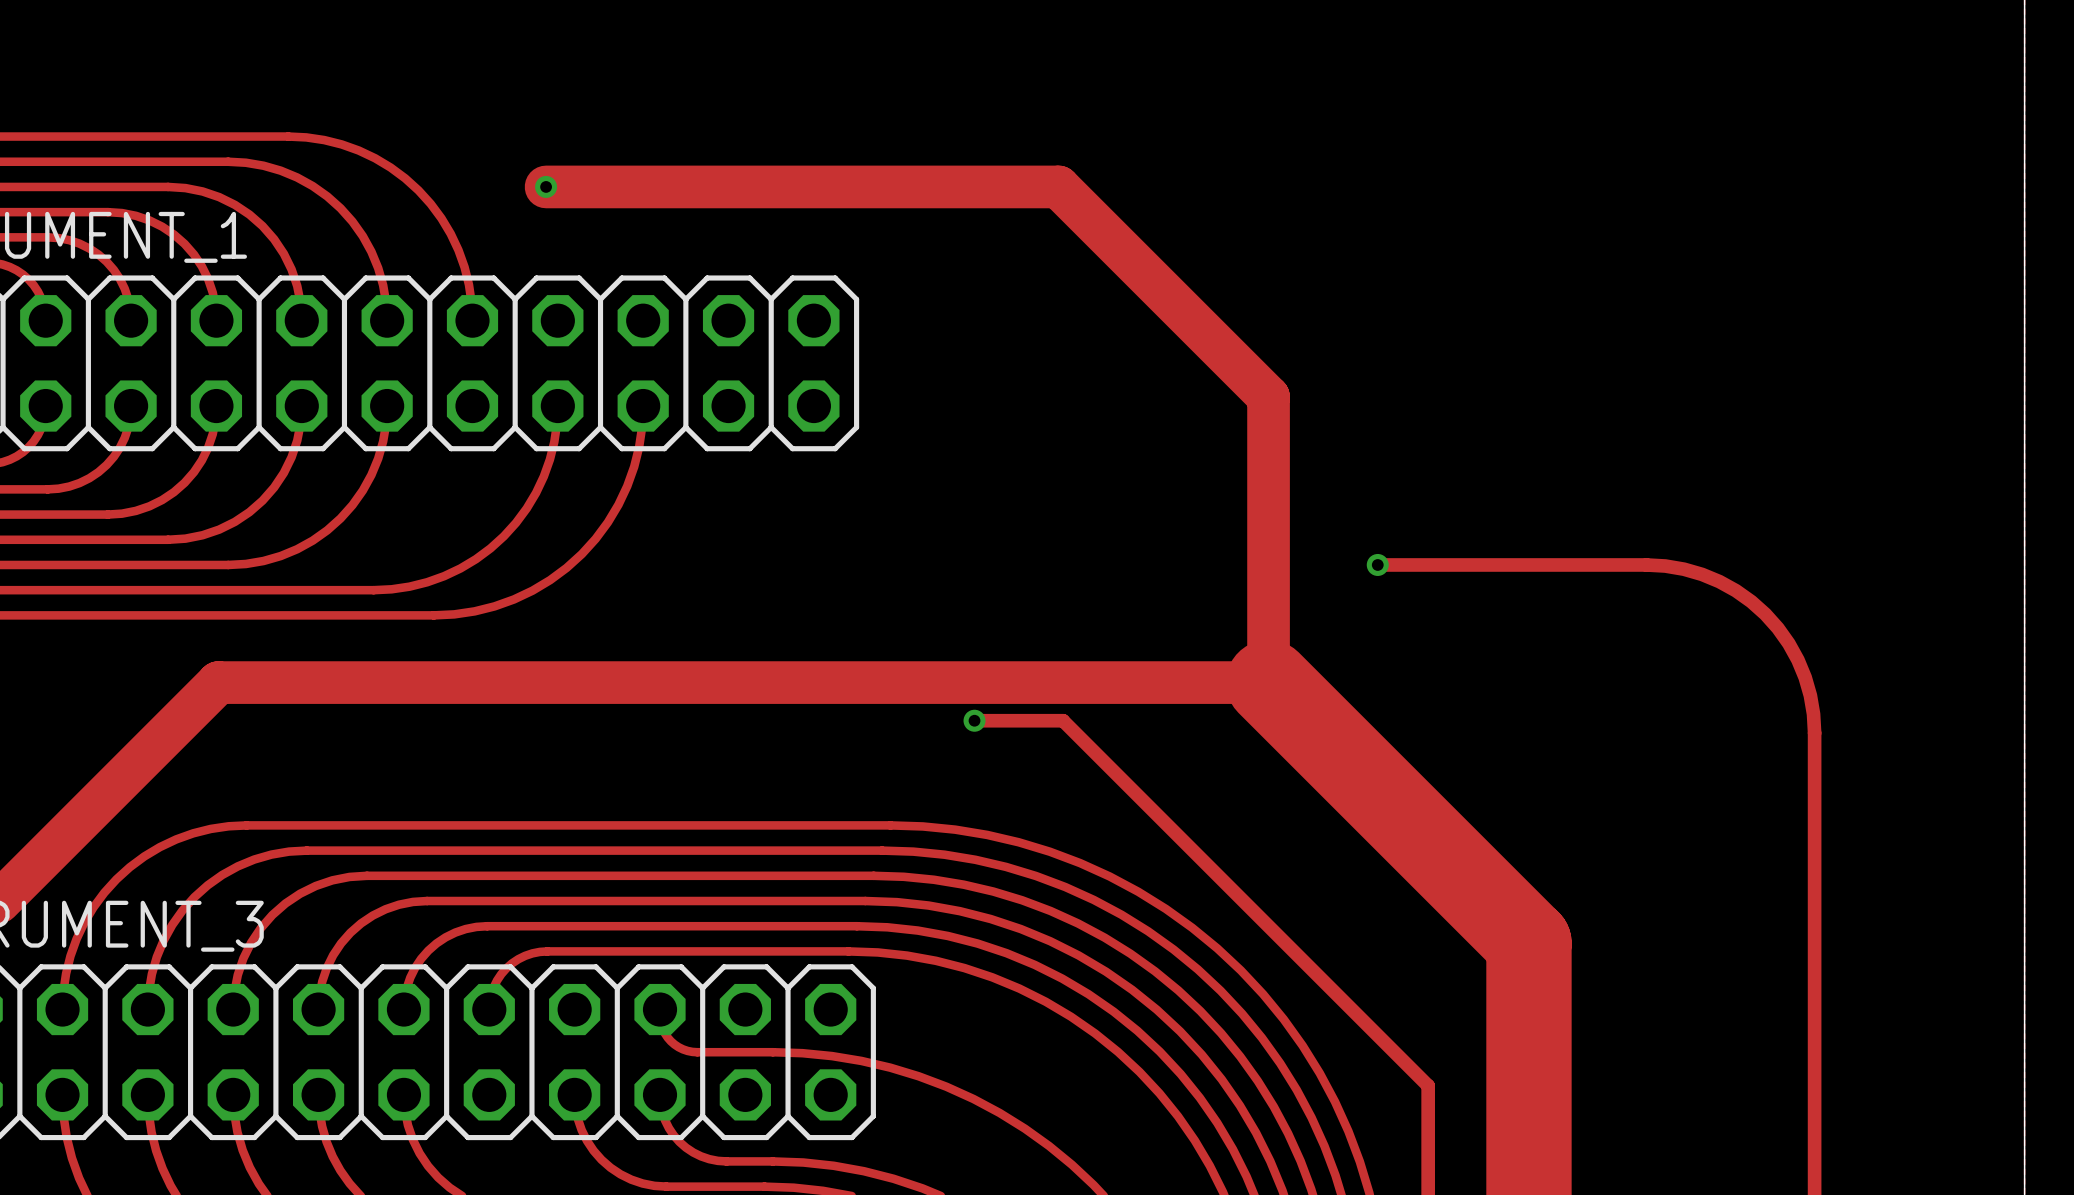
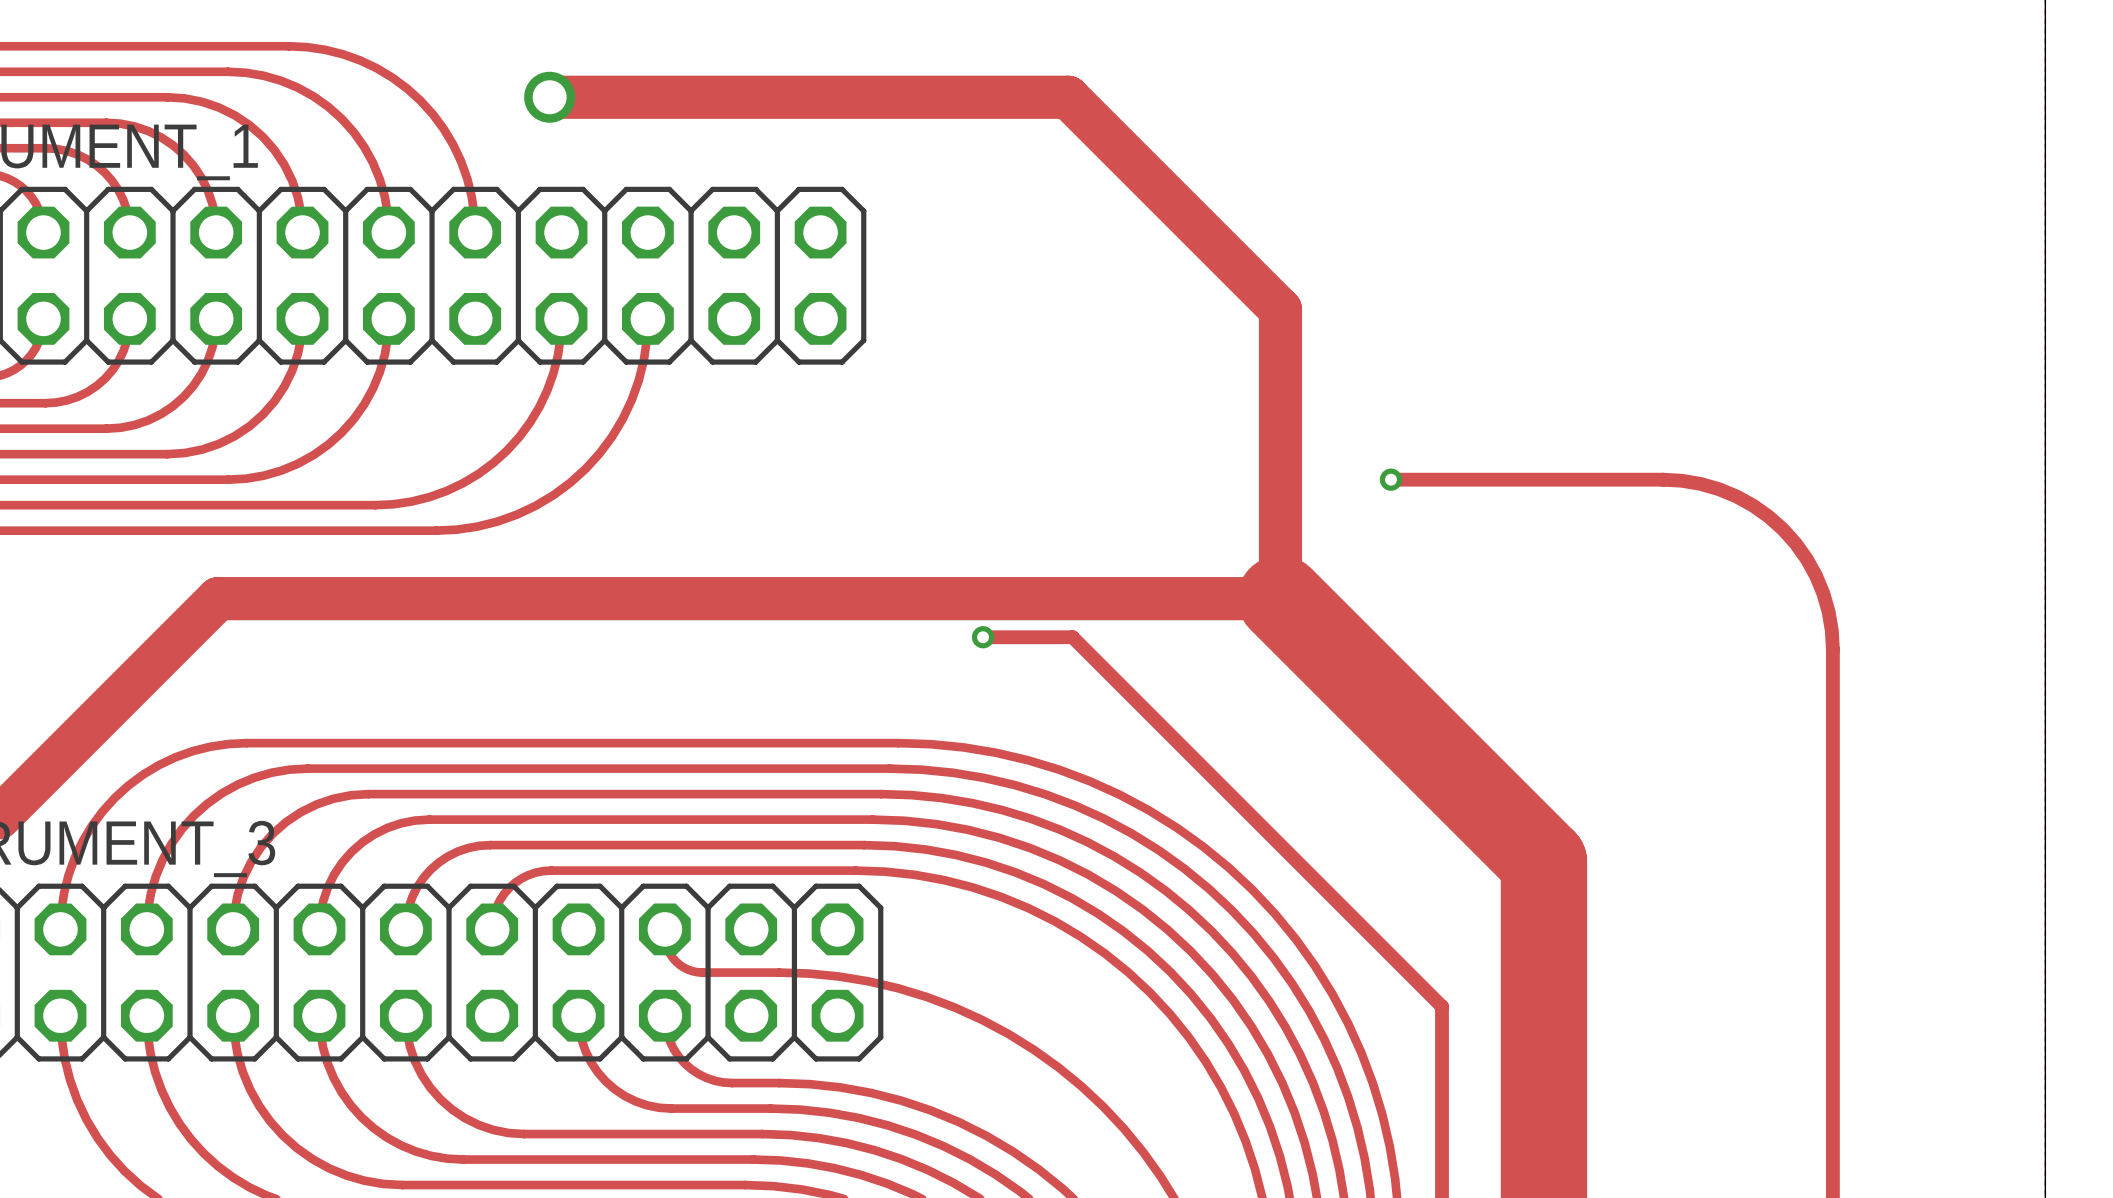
via size: [535, 175, 558, 198] -> [524, 71, 576, 123]

